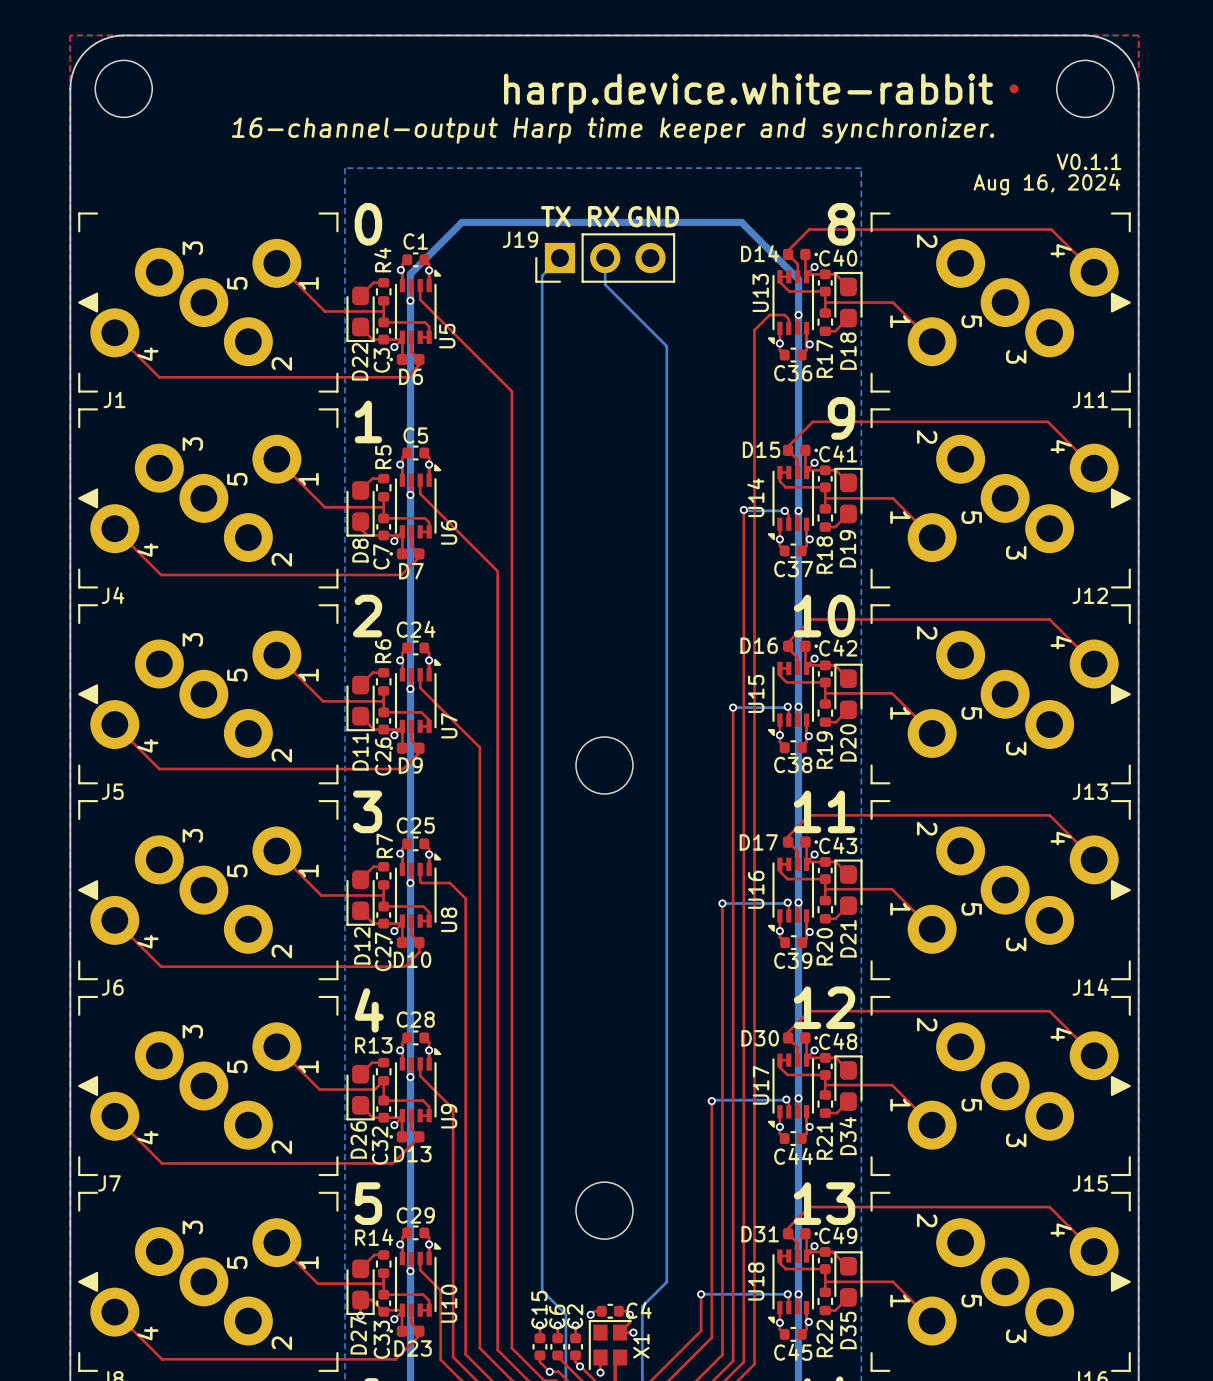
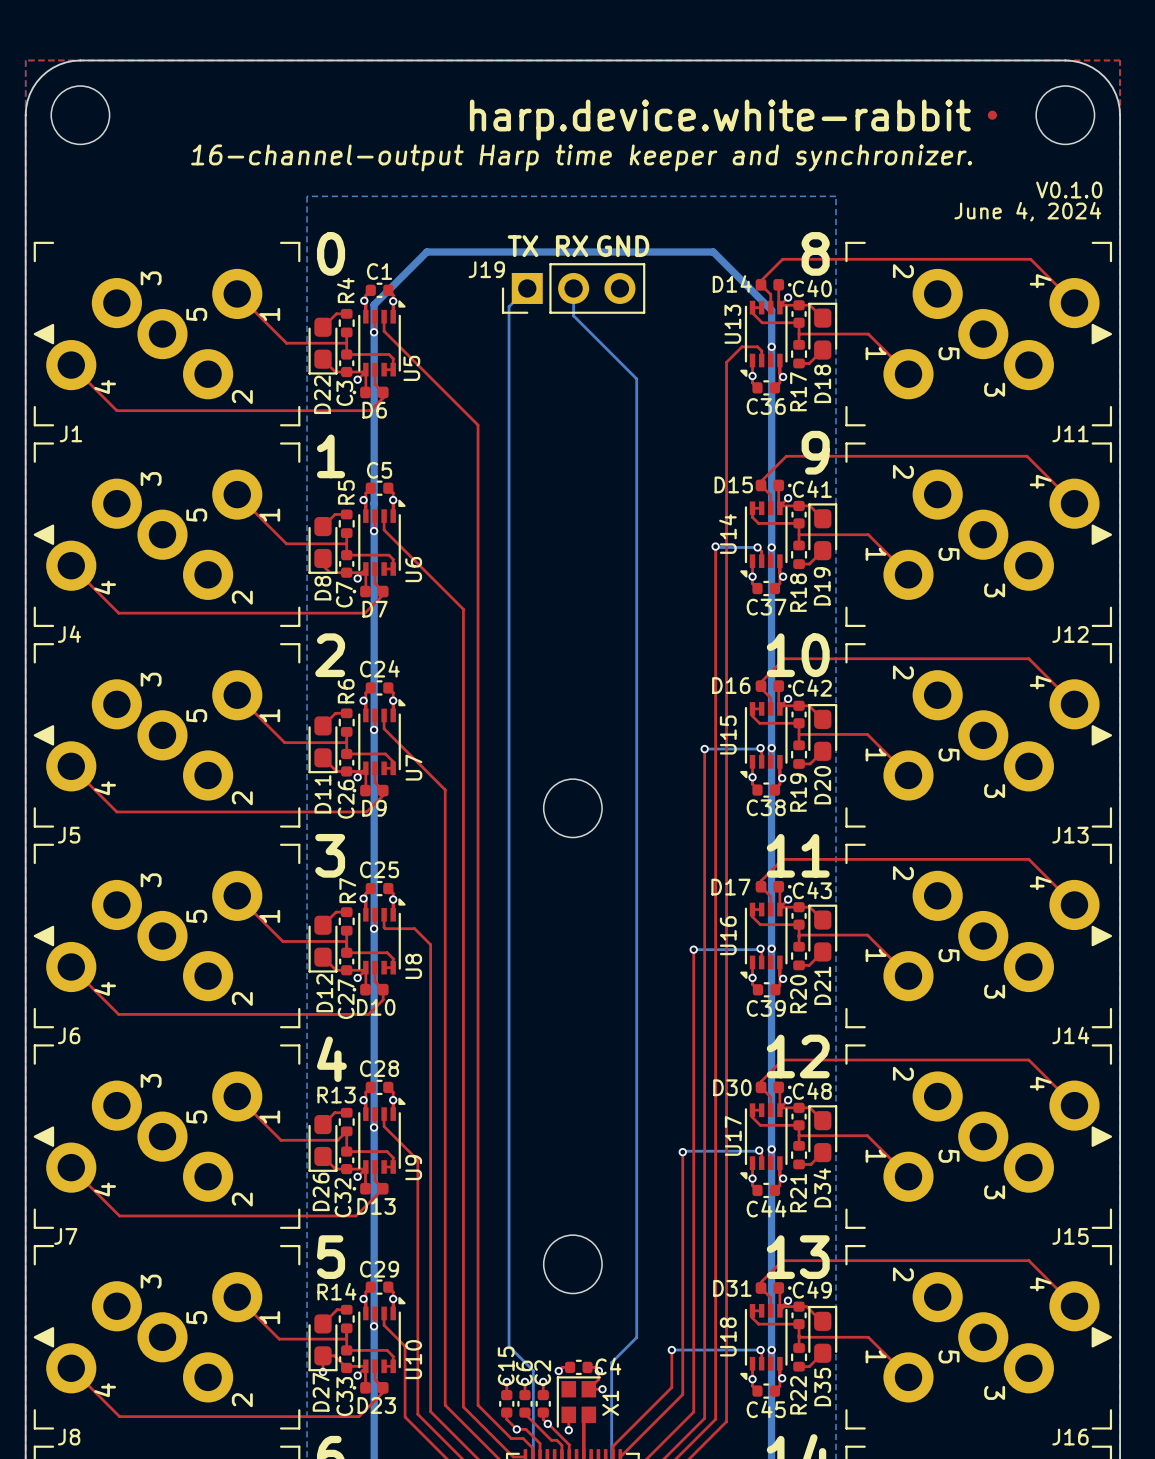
text: V0.1.1 (1089, 161) -> V0.1.0 (1069, 190)
text: Aug 16, 2024 (1046, 184) -> June 4, 2024 (1027, 211)

